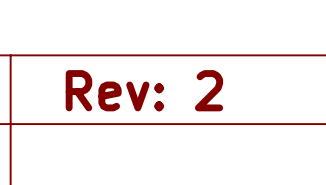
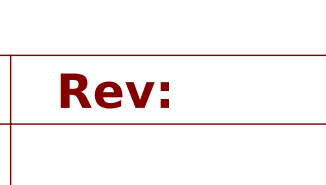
title block: Rev: 2 (144, 90) -> Rev: (114, 91)

